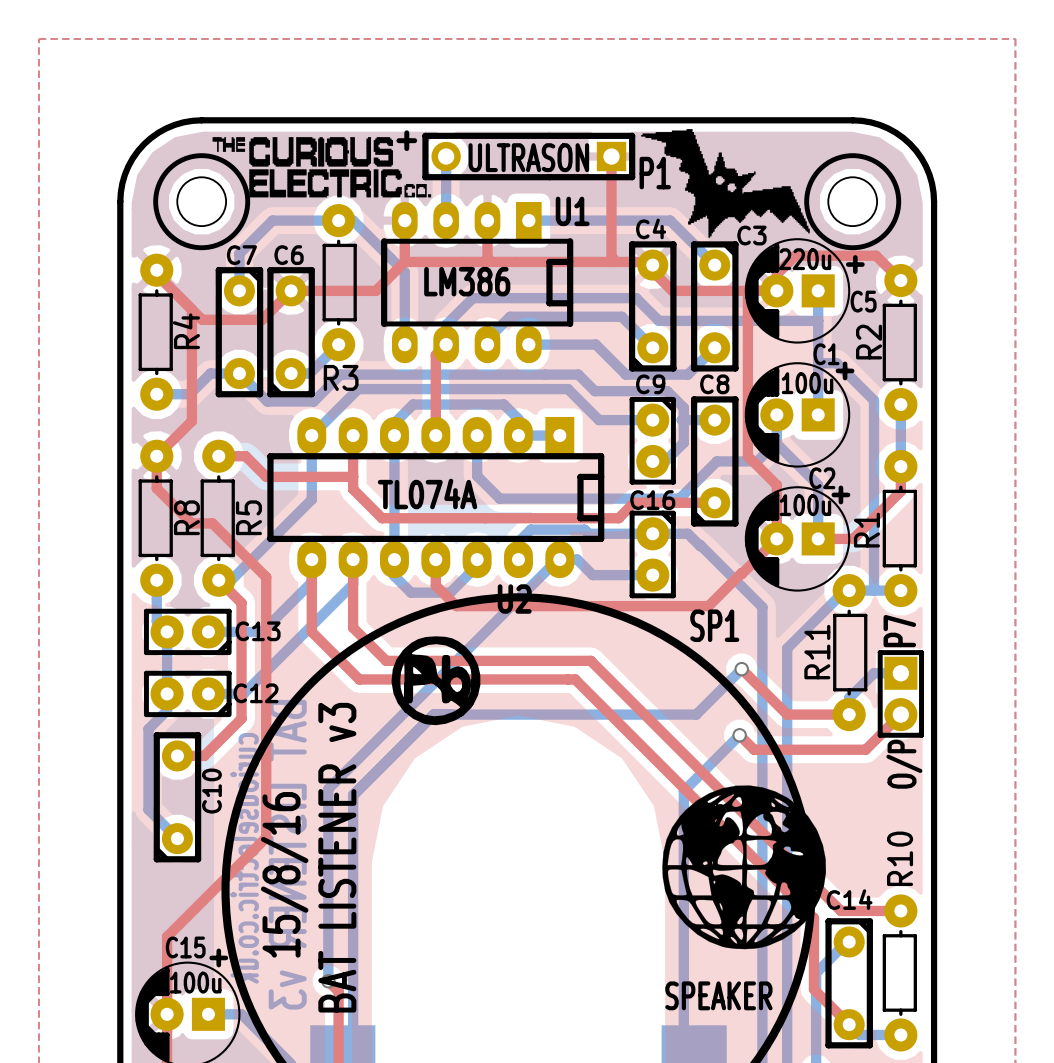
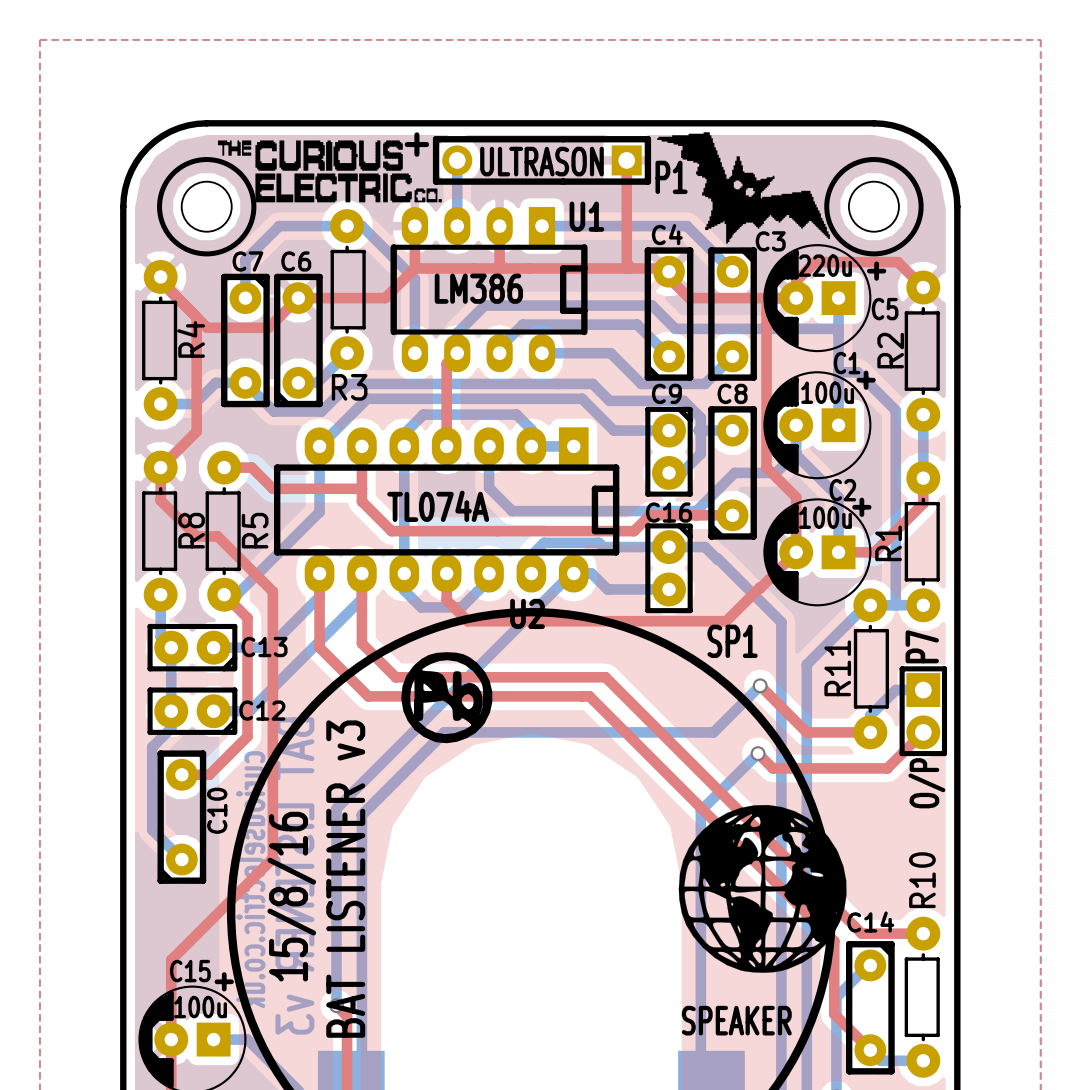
P1 footprint: [422, 132, 636, 181] -> [432, 136, 652, 185]

